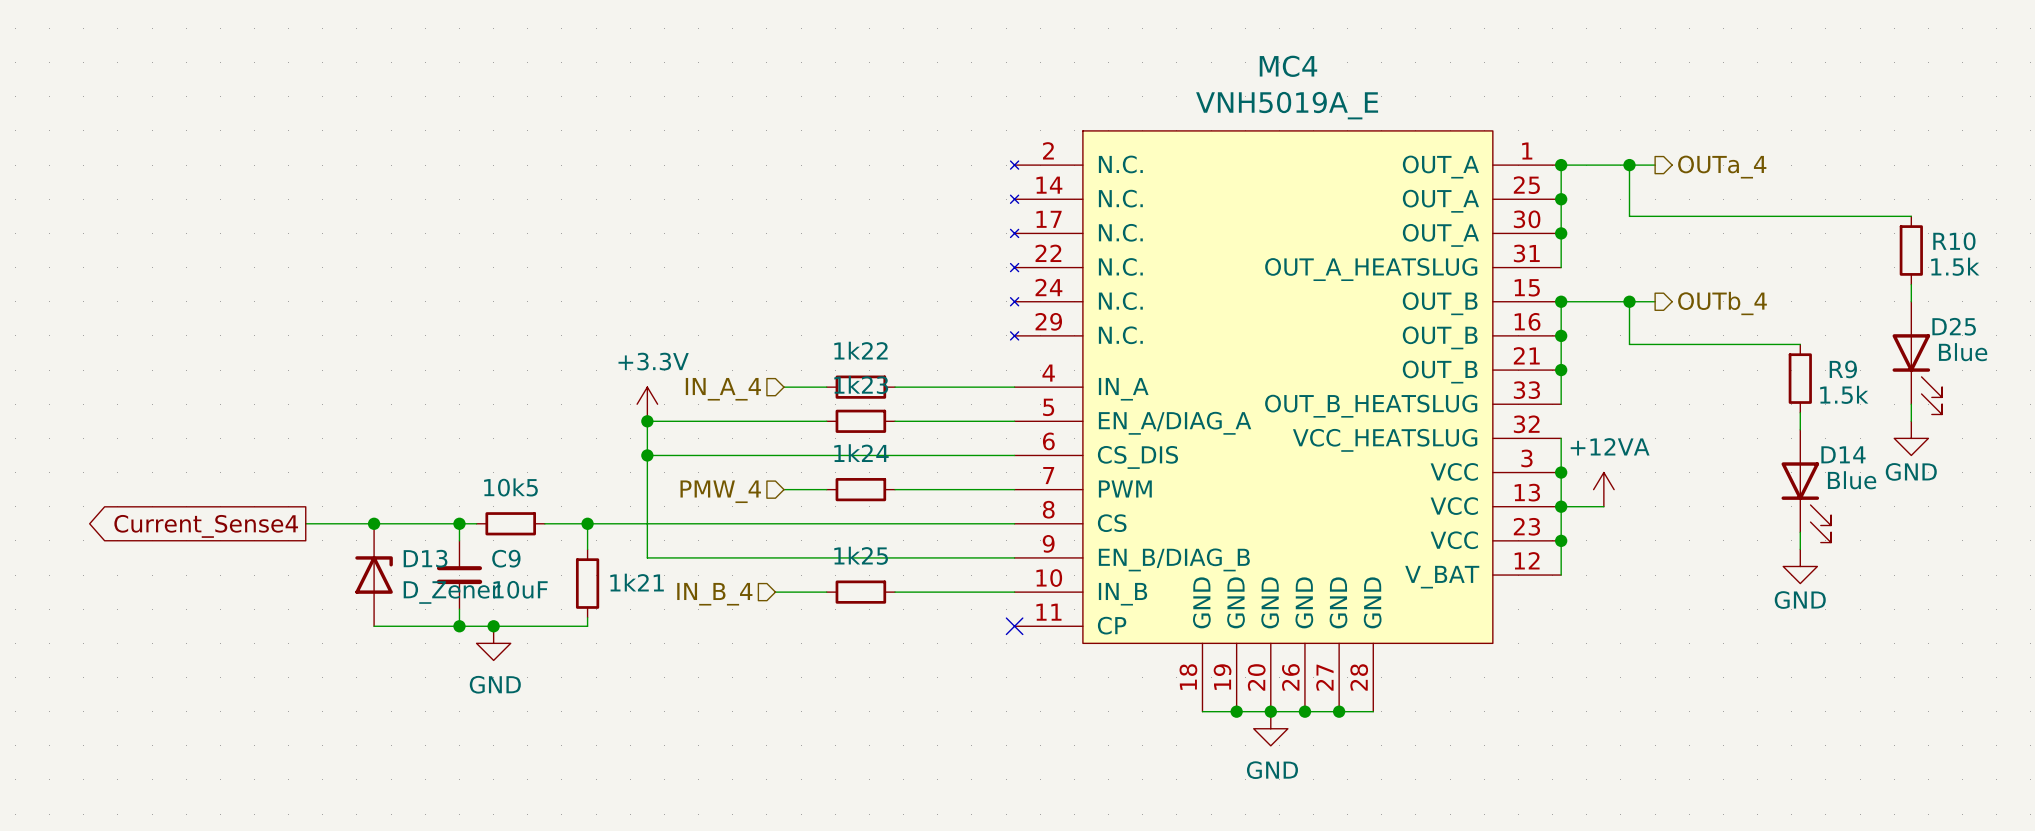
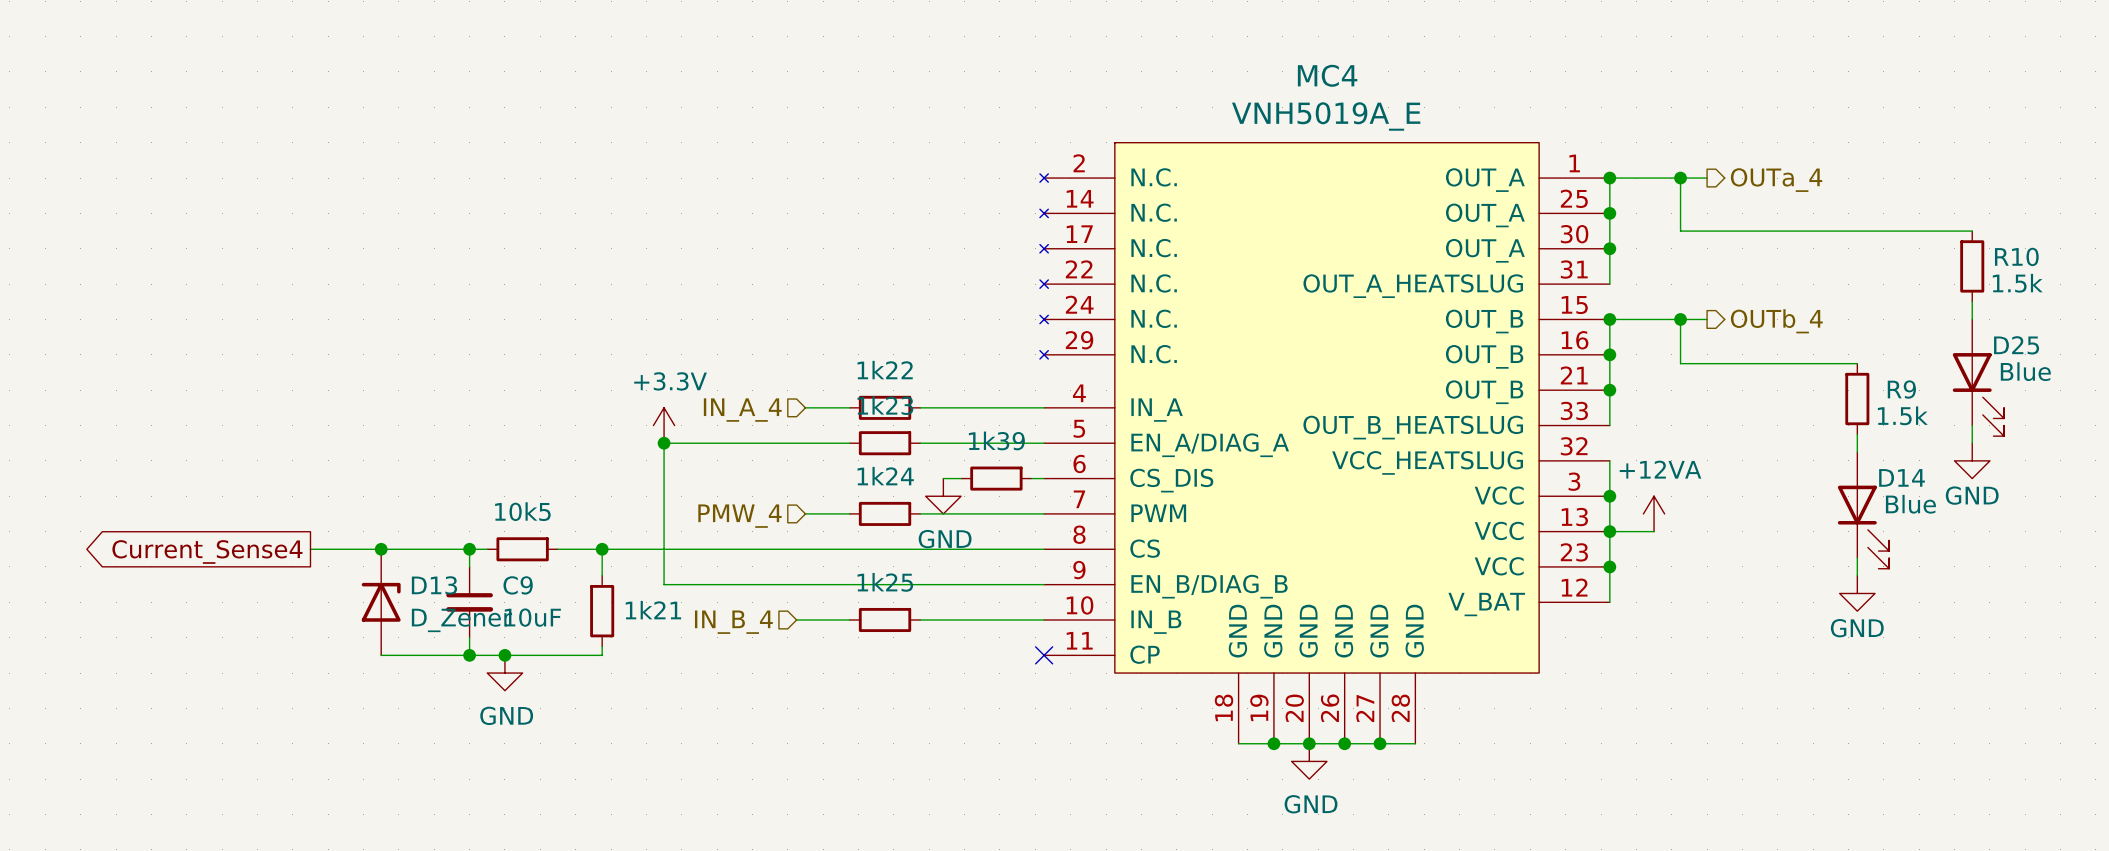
wire: (647, 455) (917, 455) -> none
junction: (647, 455) -> none
wire: (934, 455) (1002, 455) -> none
1k39: none -> (996, 478)
power symbol: none -> GND (943, 496)

